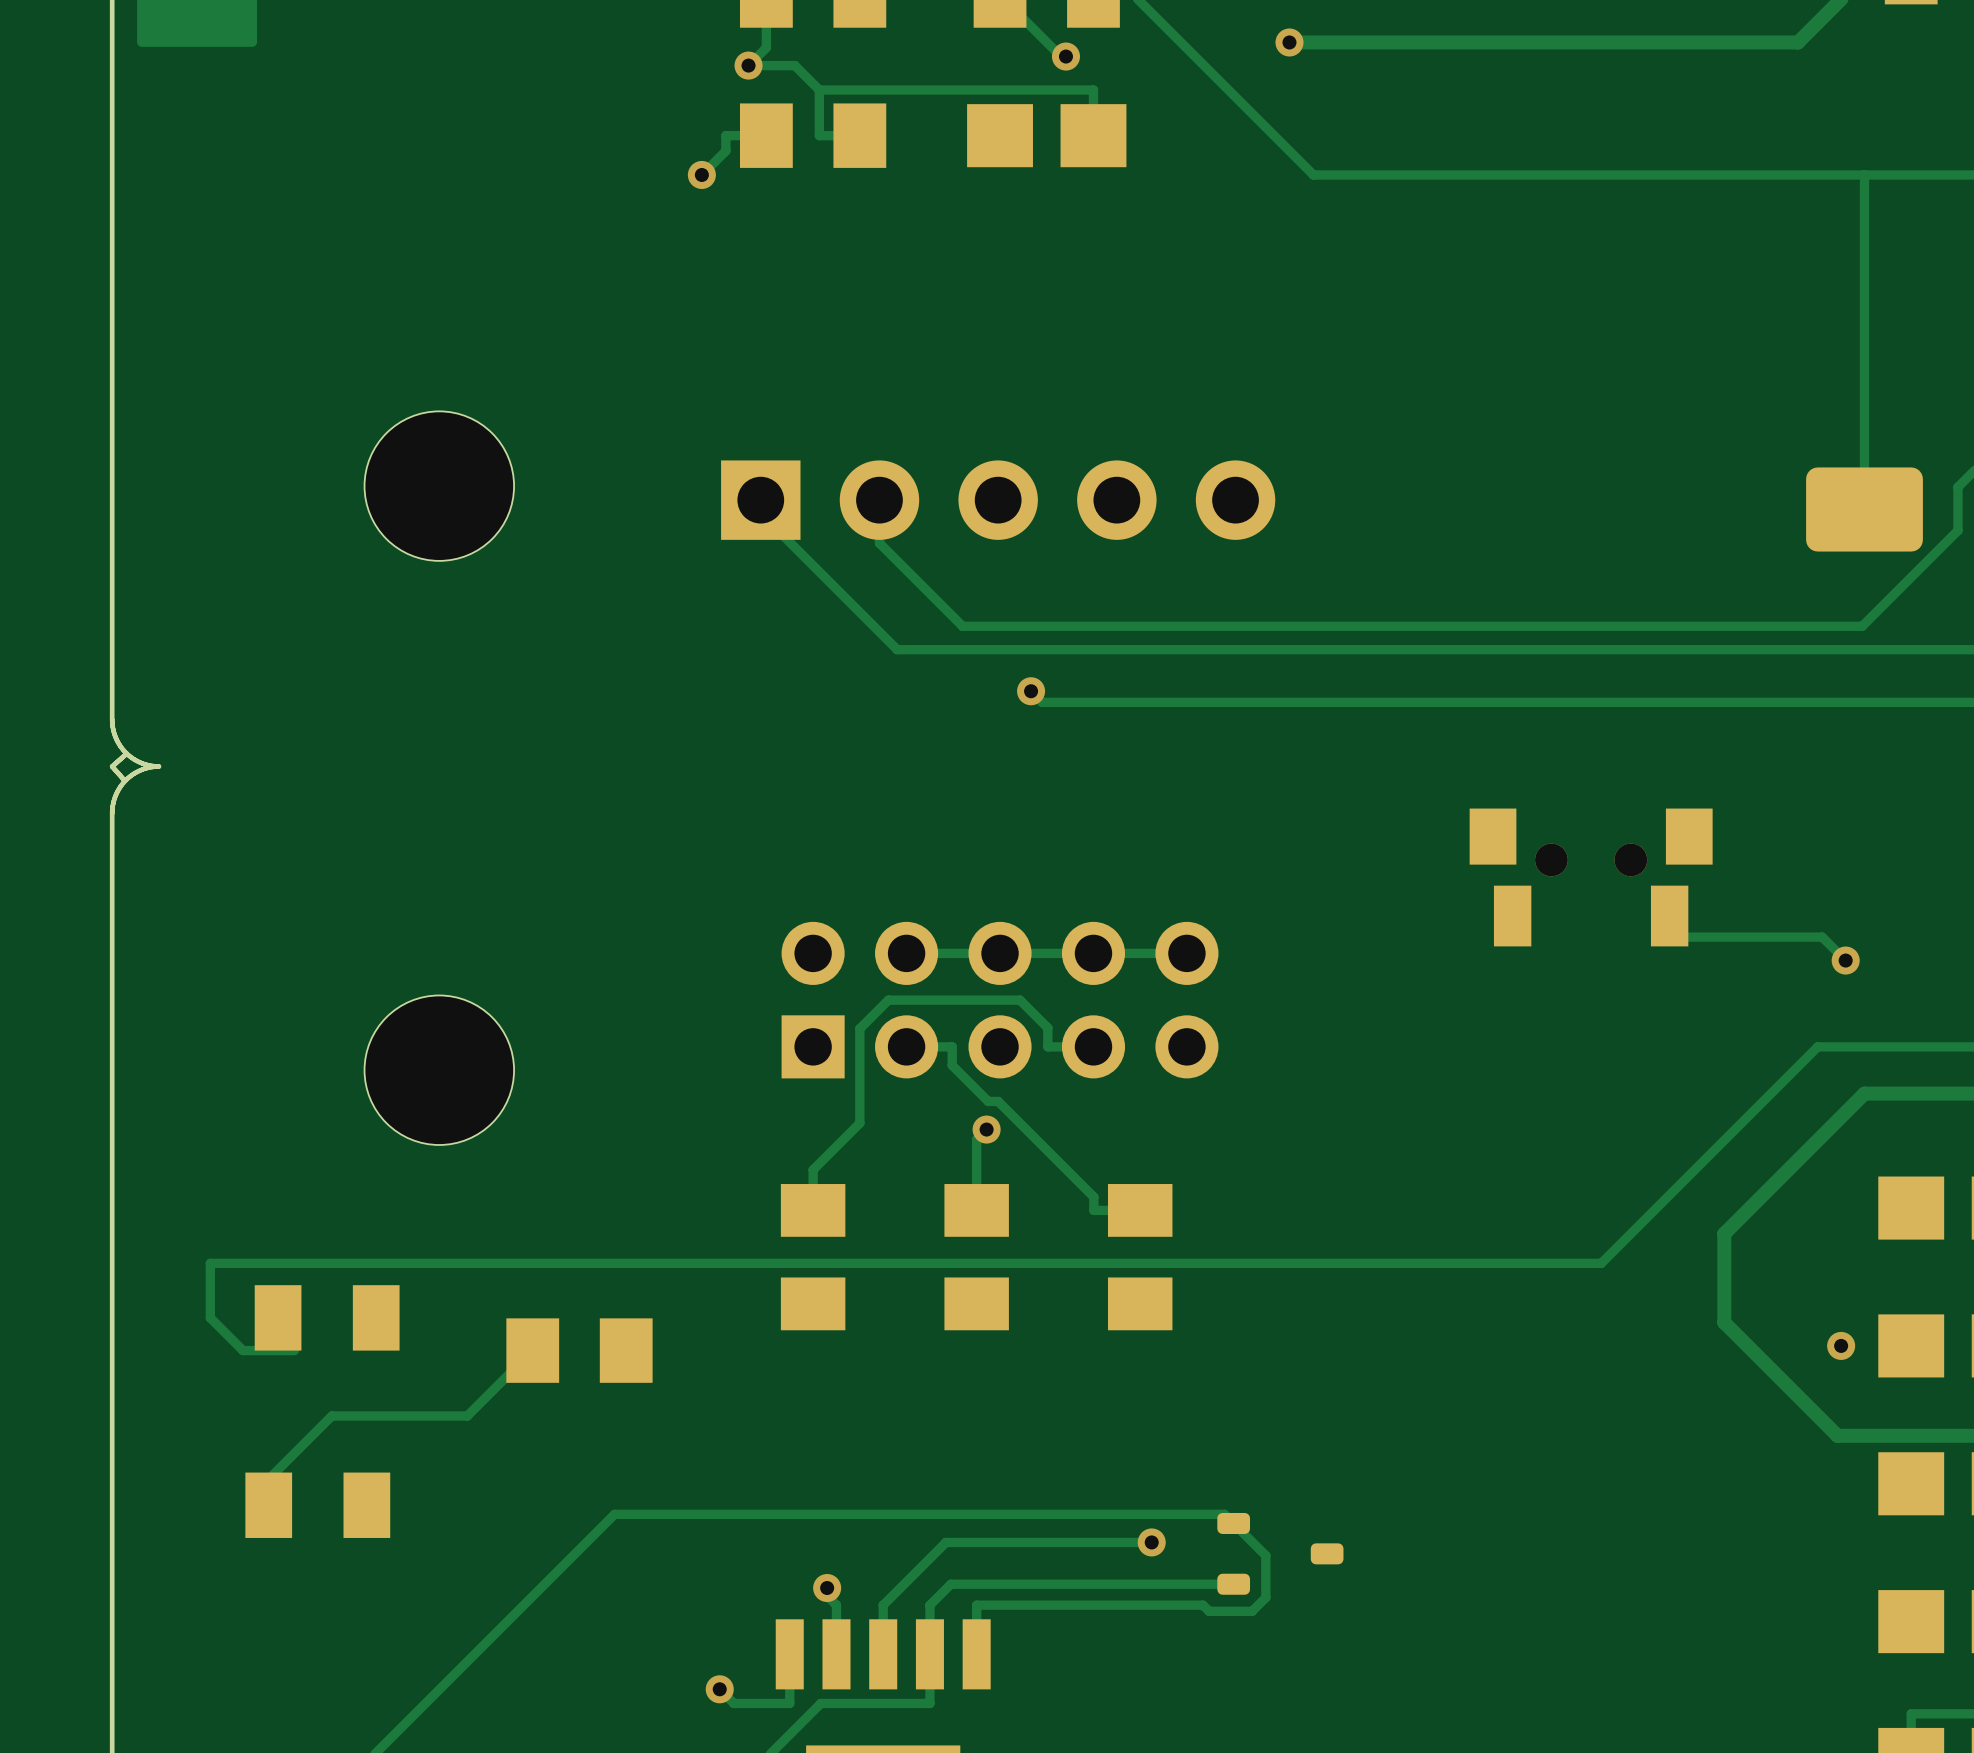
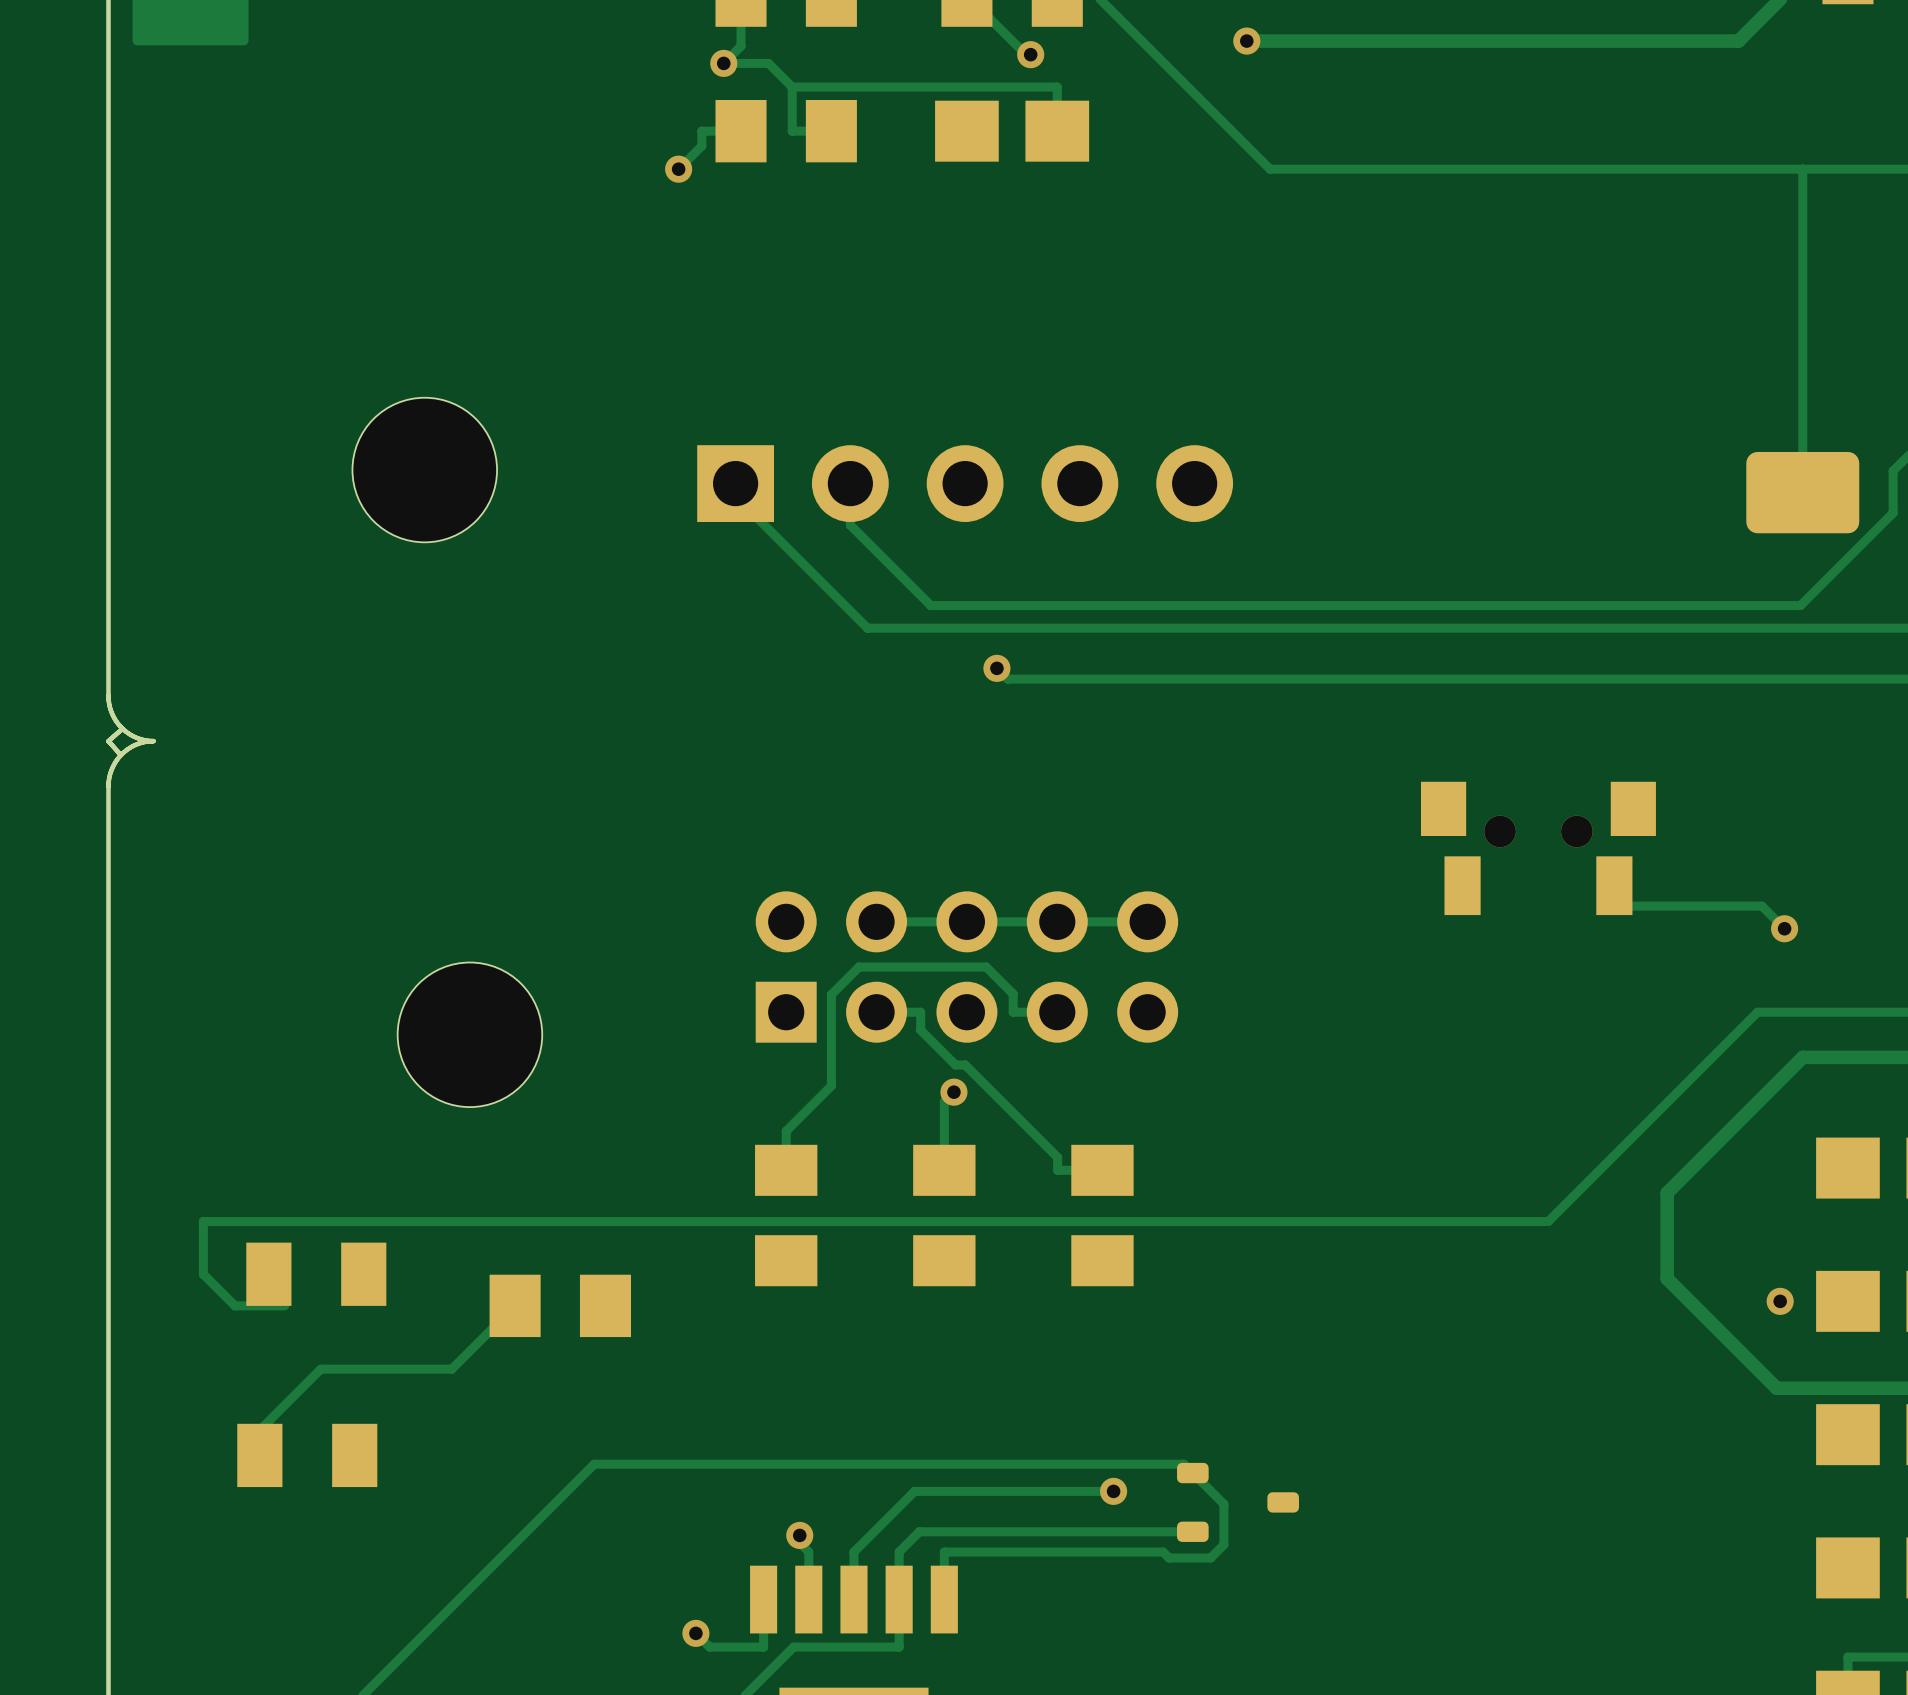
part position: (439, 1070) -> (469, 1034)

